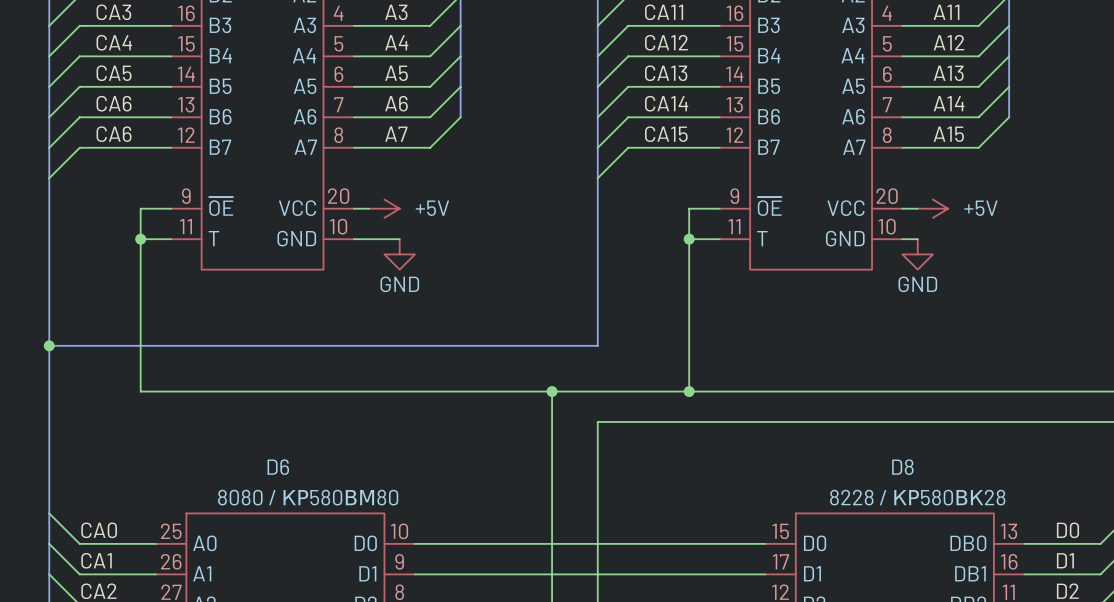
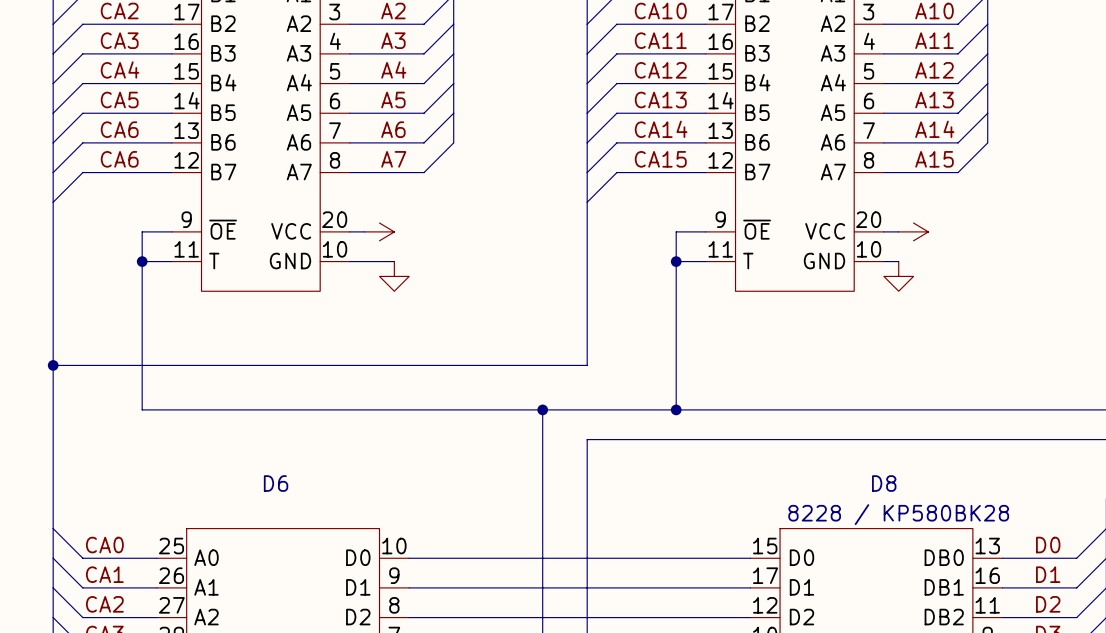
power symbol text: +5V (432, 208) -> none
power symbol text: +5V (980, 208) -> none
power symbol text: GND (399, 284) -> none
power symbol text: GND (917, 284) -> none
D6 value: 8080 / КР580ВМ80 (308, 497) -> none

